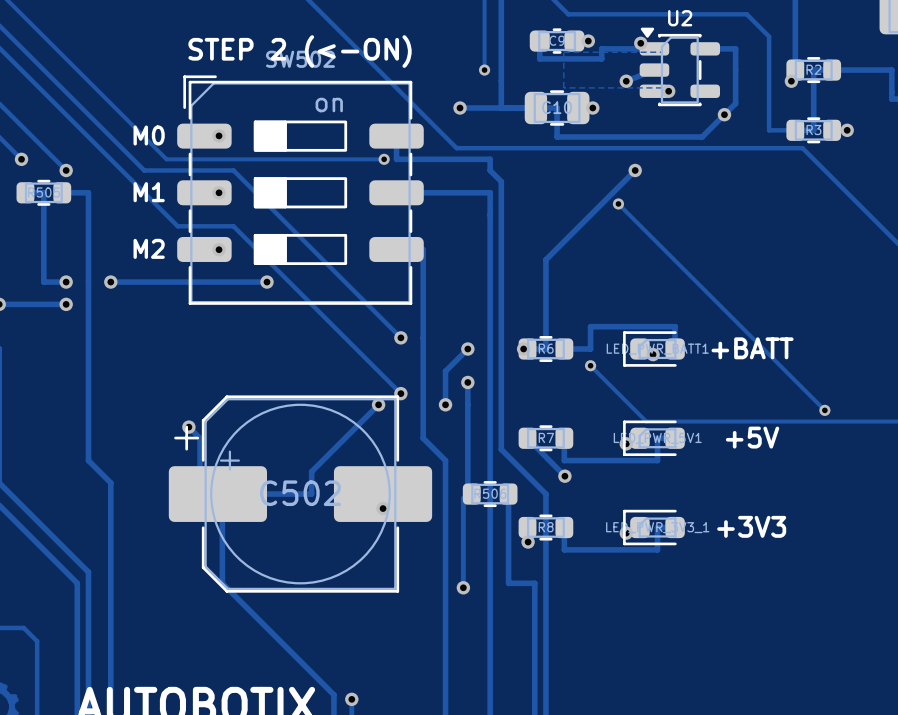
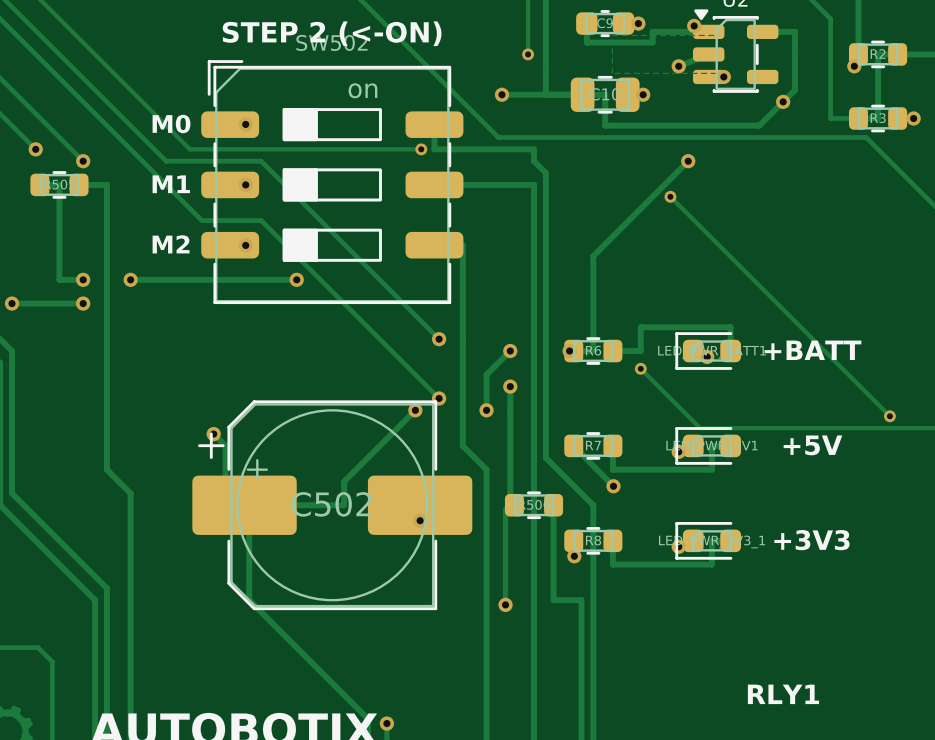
text: none -> RLY1 (783, 694)

